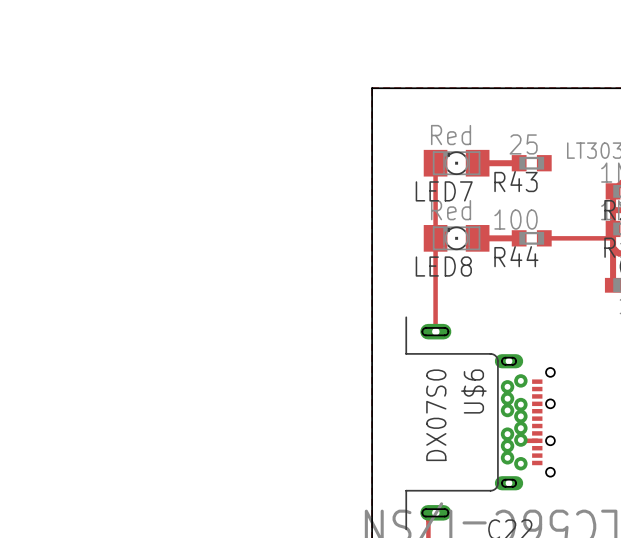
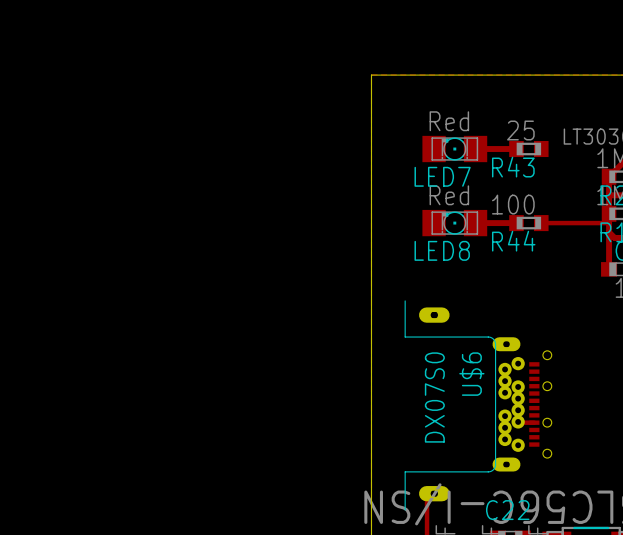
track: (435, 163) (435, 331) -> none

